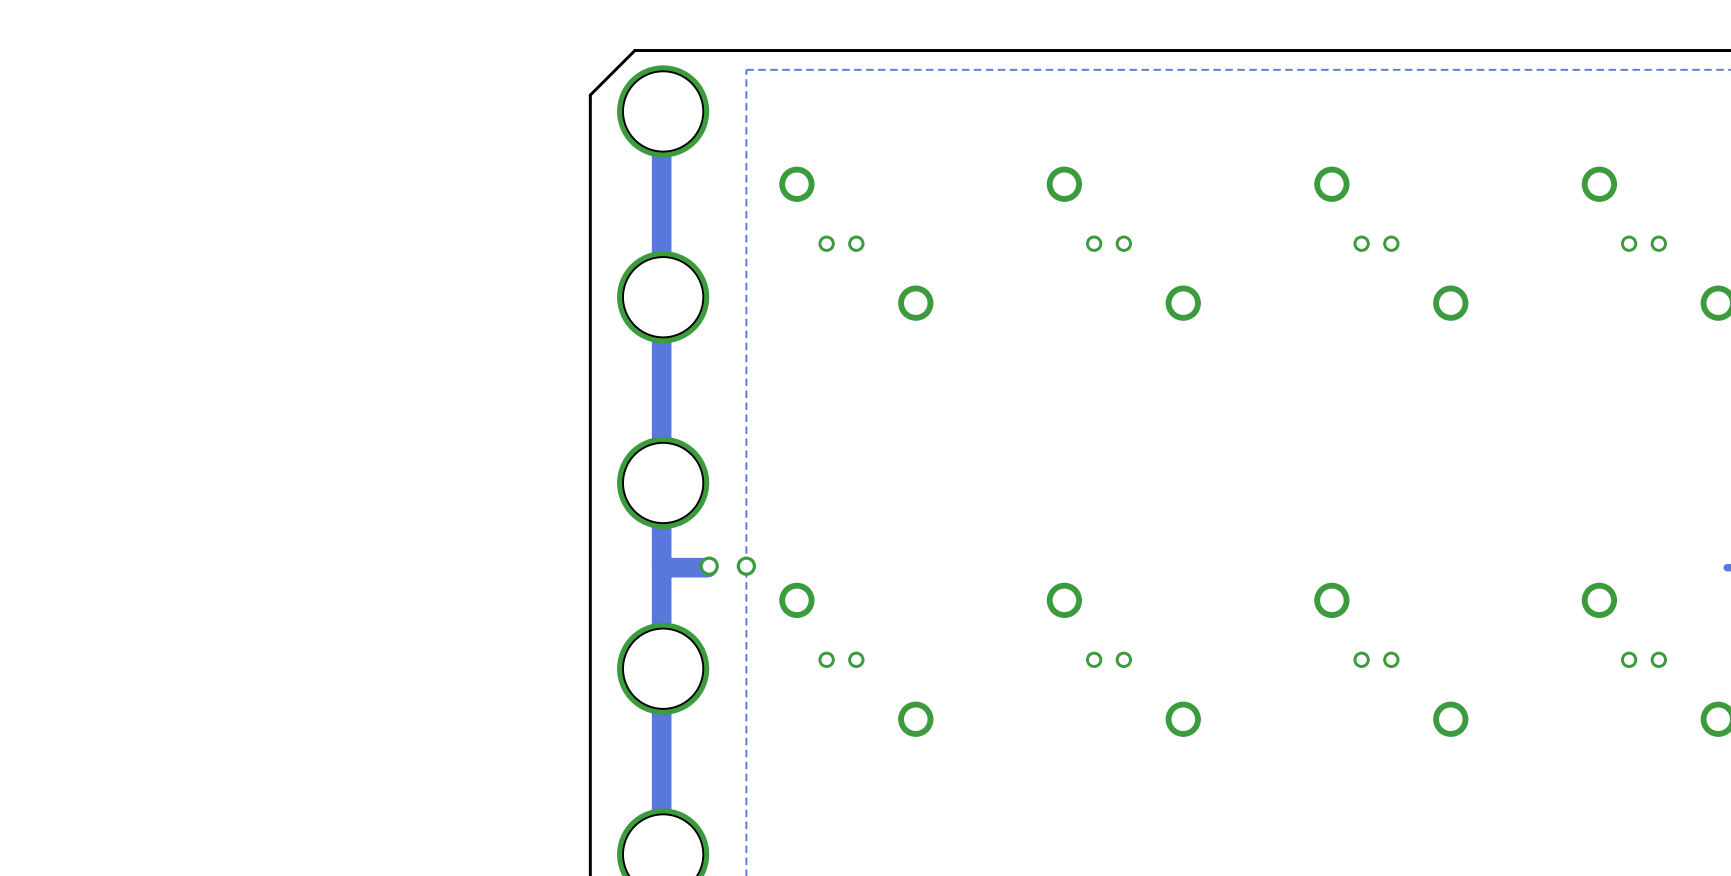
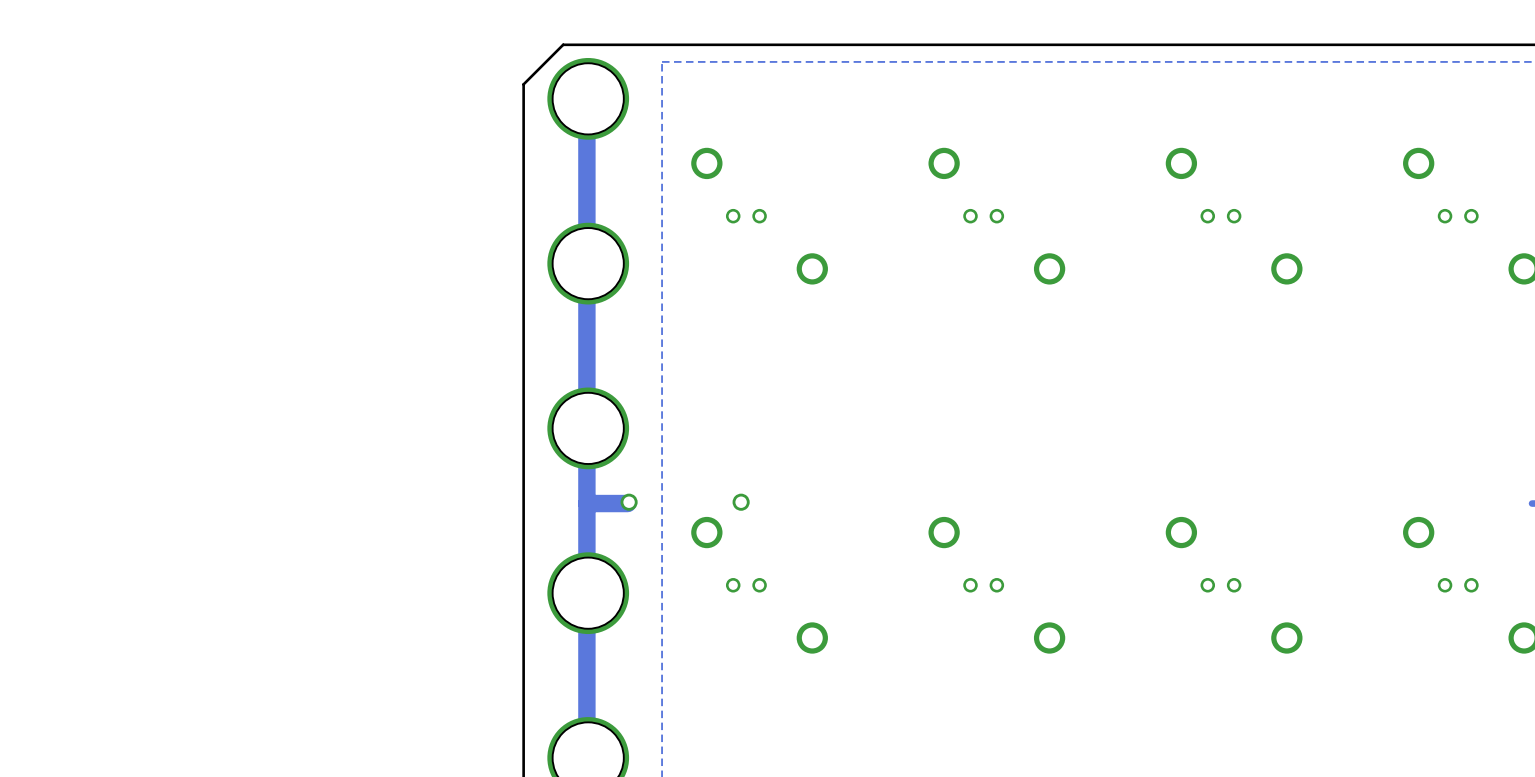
via: (746, 566) -> none
via: none -> (741, 502)

